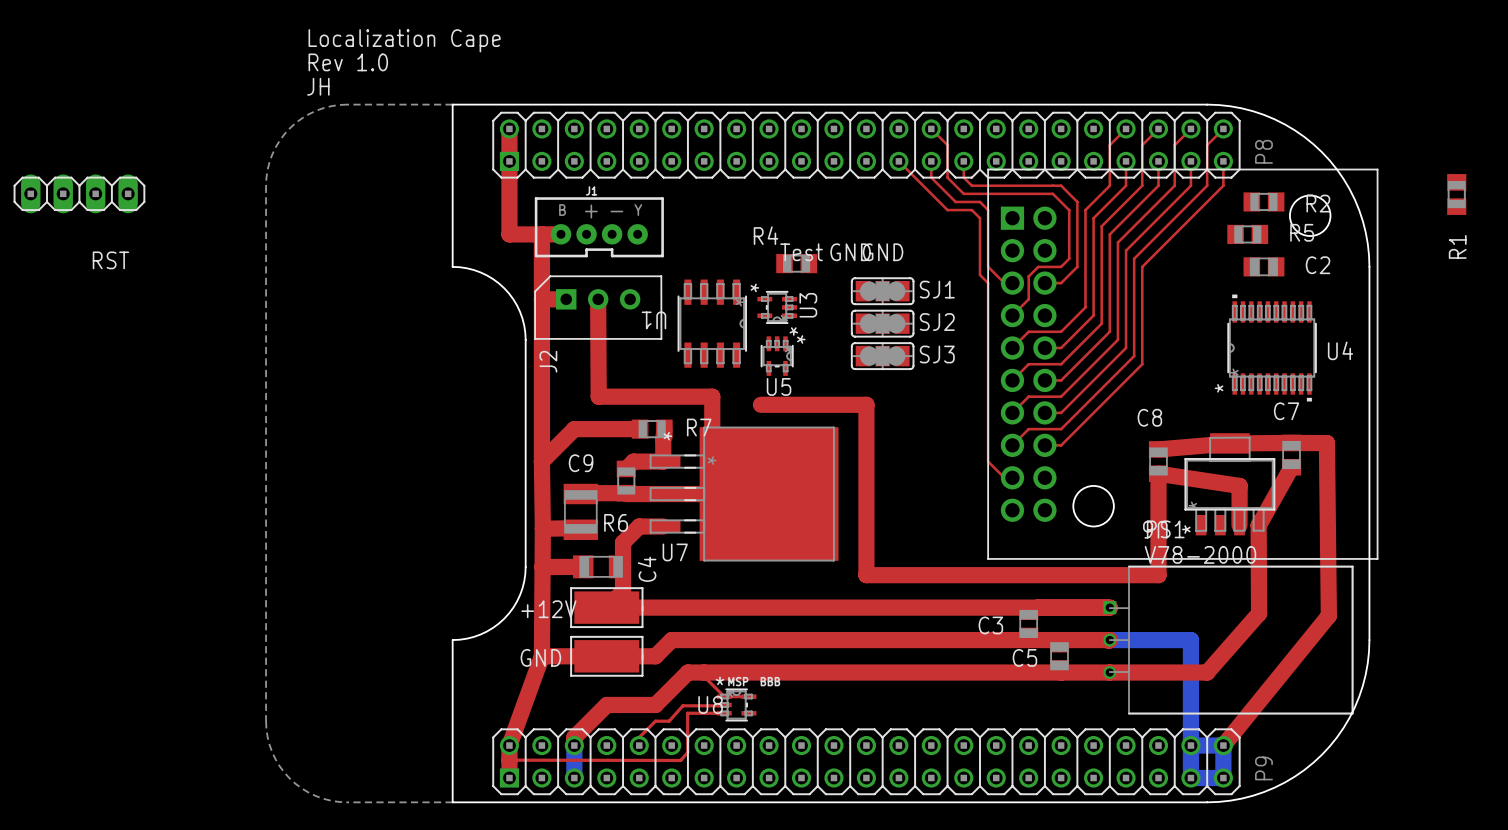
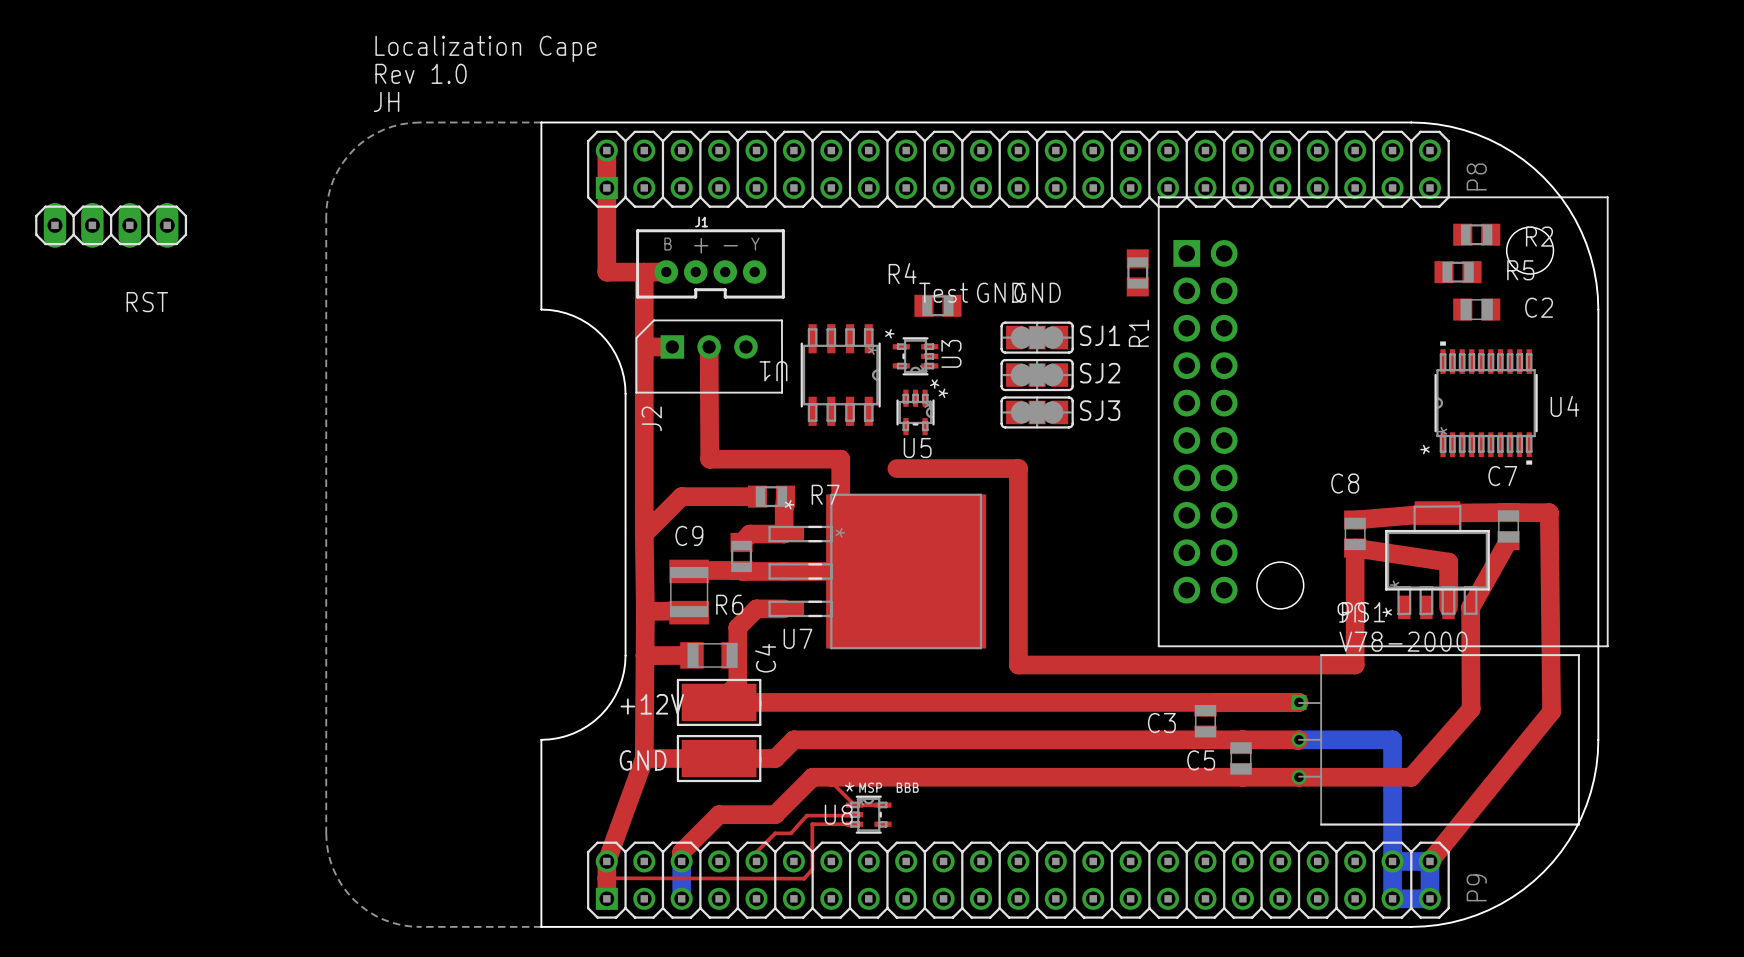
top track: (931, 128) (947, 145) (947, 177) (963, 193) (1052, 193) (1069, 210) -> none
top track: (1126, 128) (1109, 145) (1109, 185) (1085, 210) (1085, 307) (1061, 331) (1028, 331) (1012, 348) -> none
top track: (1158, 128) (1142, 145) (1142, 185) (1101, 226) (1101, 323) (1061, 364) (1028, 364) (1012, 380) -> none
top track: (1190, 128) (1174, 145) (1174, 185) (1117, 242) (1117, 339) (1061, 396) (1028, 396) (1012, 412) -> none
top track: (1223, 128) (1207, 145) (1207, 185) (1134, 258) (1134, 356) (1061, 429) (1028, 429) (1012, 445) -> none
top track: (898, 161) (947, 210) (971, 210) (980, 218) (980, 274) (988, 283) (988, 461) (1004, 477) (1012, 477) -> none
top track: (931, 161) (931, 177) (955, 201) (980, 201) (988, 210) (988, 266) (1004, 283) (1012, 283) -> none
top track: (963, 161) (963, 177) (971, 185) (1061, 185) (1077, 201) (1077, 266) (1061, 283) (1044, 283) -> none
top track: (1126, 161) (1126, 185) (1093, 218) (1093, 315) (1061, 348) (1044, 348) -> none
top track: (1158, 161) (1158, 185) (1109, 234) (1109, 331) (1061, 380) (1044, 380) -> none
top track: (1190, 161) (1190, 185) (1126, 250) (1126, 348) (1061, 412) (1044, 412) -> none
top track: (1223, 161) (1223, 185) (1142, 266) (1142, 364) (1061, 445) (1044, 445) -> none
R1 position: (1456, 194) -> (1137, 272)
top track: (1069, 210) (1069, 258) (1061, 266) (1038, 266) (1028, 276) (1028, 299) (1012, 315) -> none

